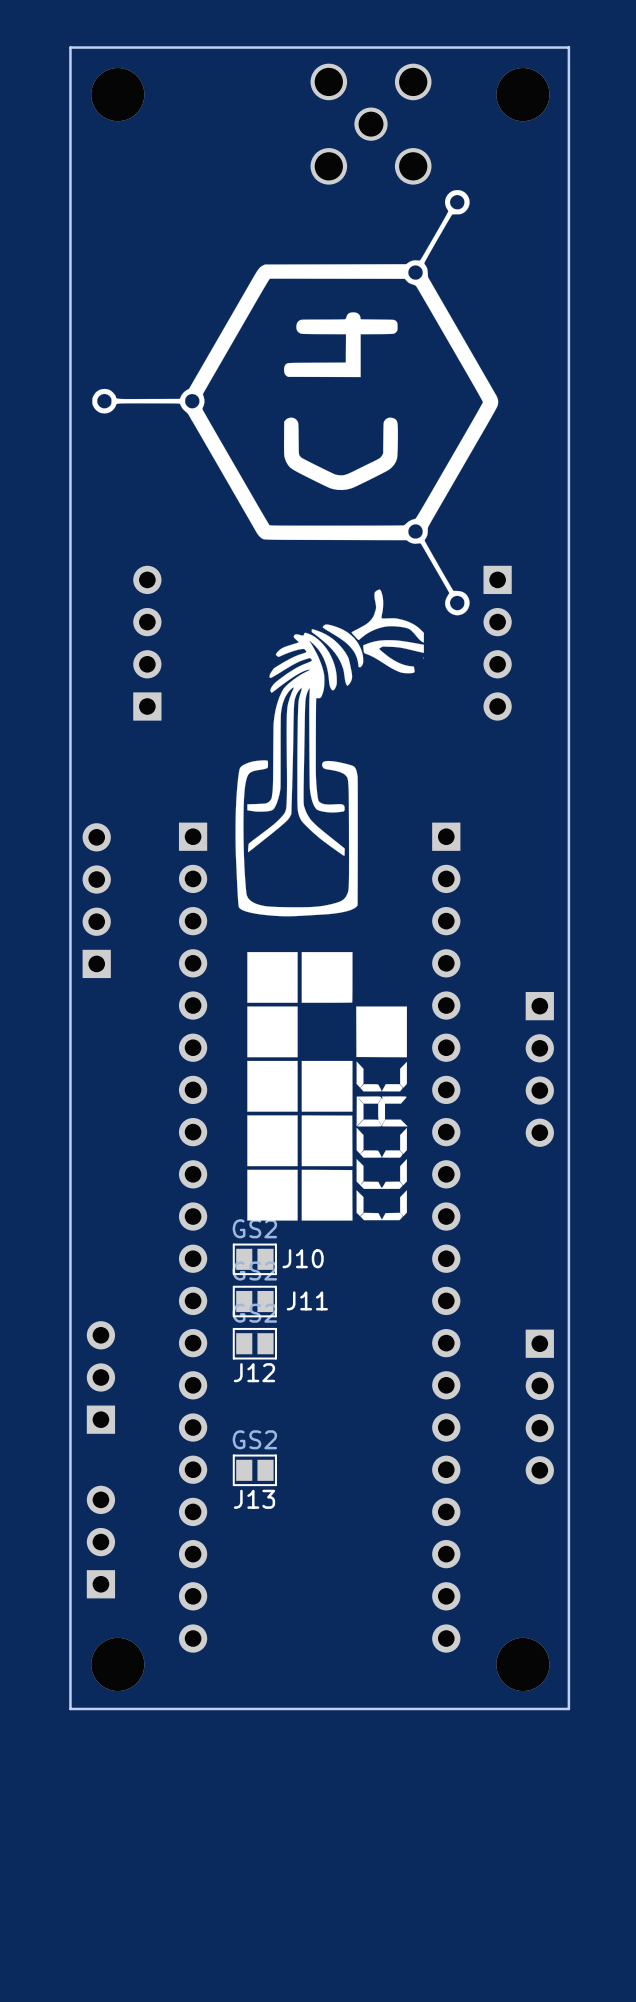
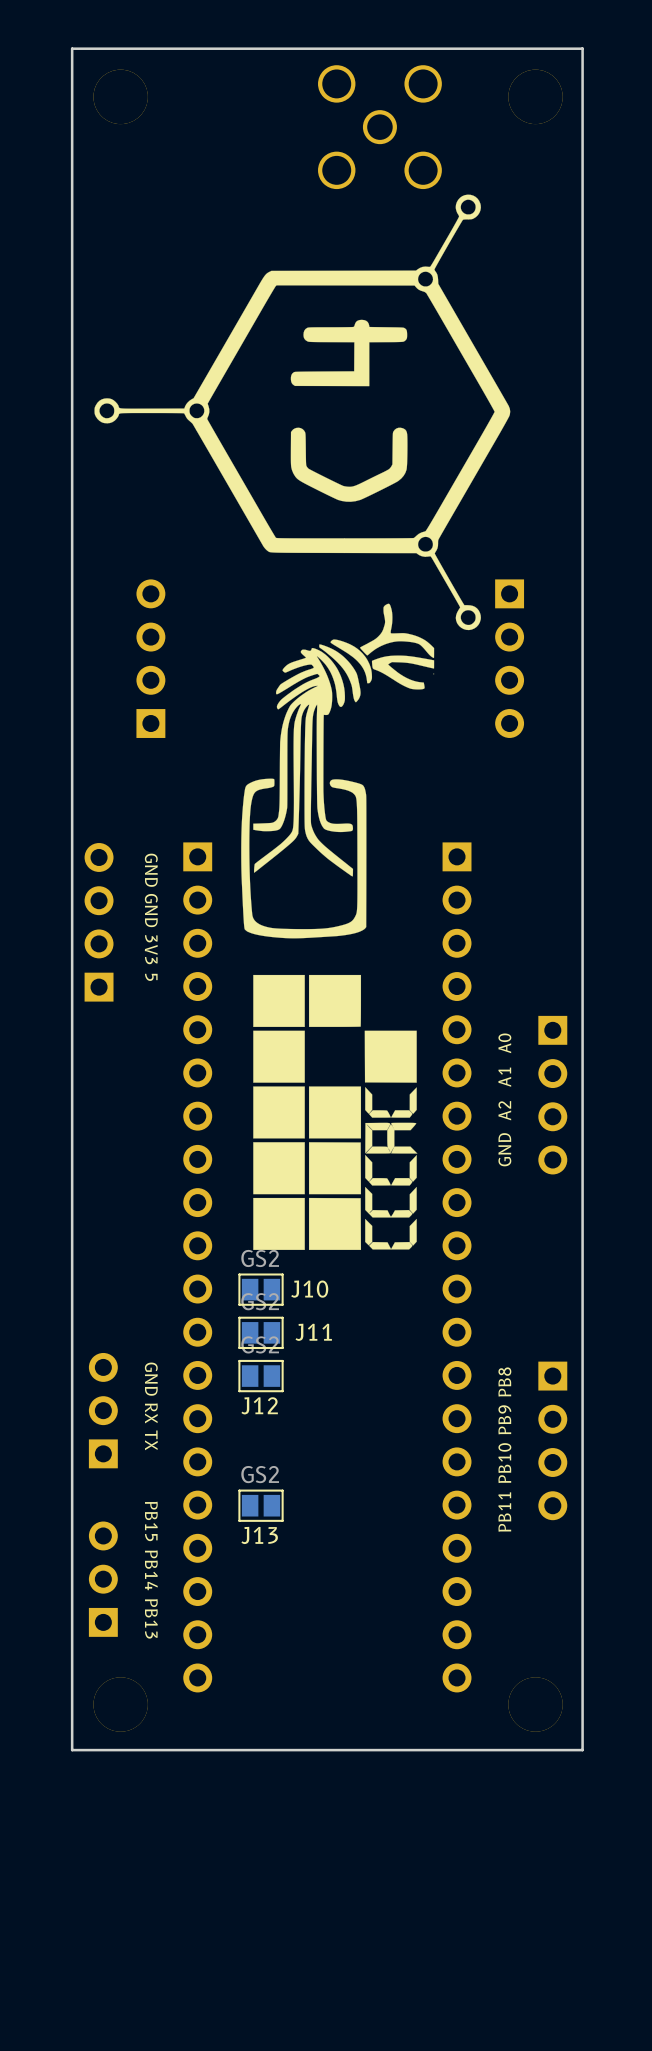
text: none -> GND GND 3V3 5 (151, 917)
text: none -> GND A2 A1 A0 (504, 1099)
text: none -> GND RX TX (151, 1406)
text: none -> PB11 PB10 PB9 PB8 (504, 1449)
text: none -> PB15 PB14 PB13 (151, 1570)

